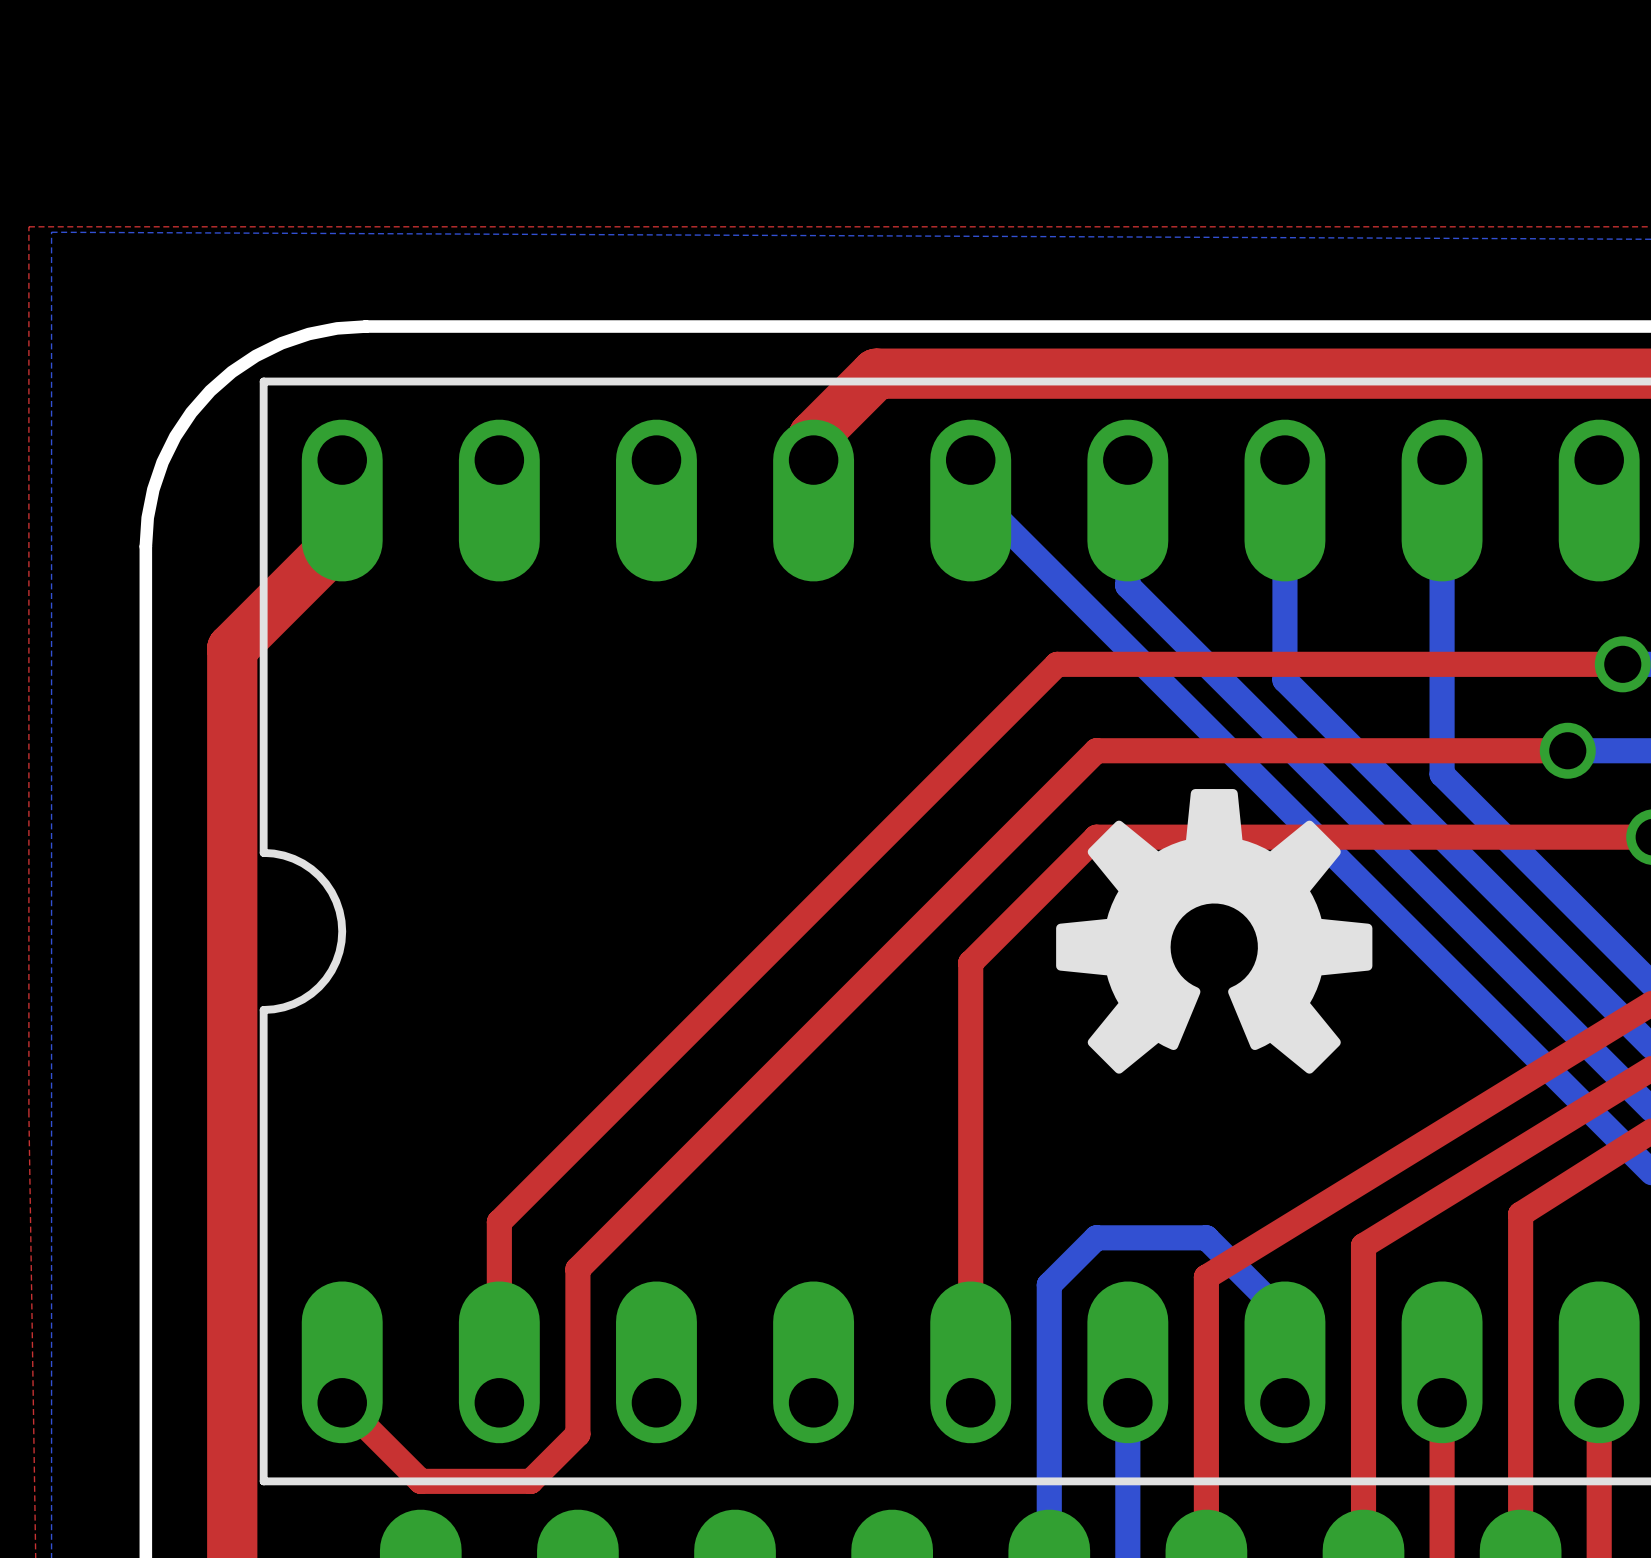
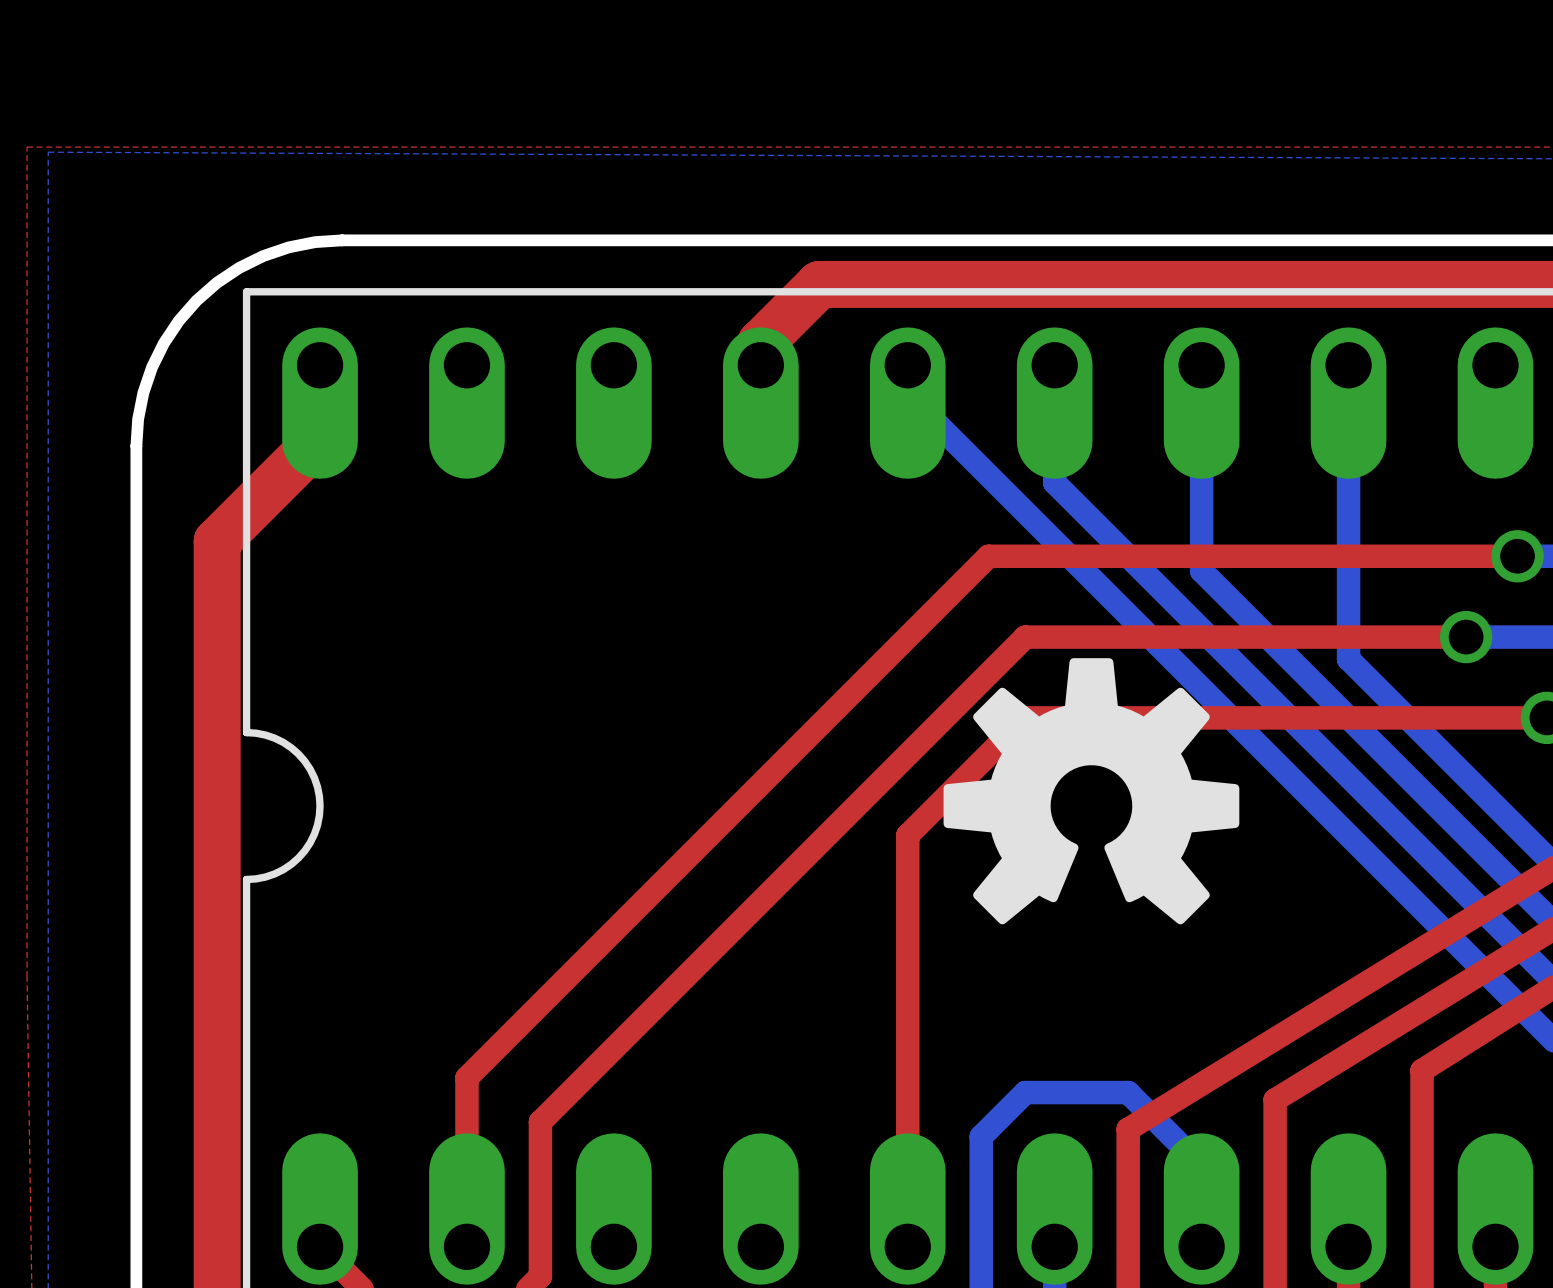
drawing position: (1214, 931) -> (1091, 791)

